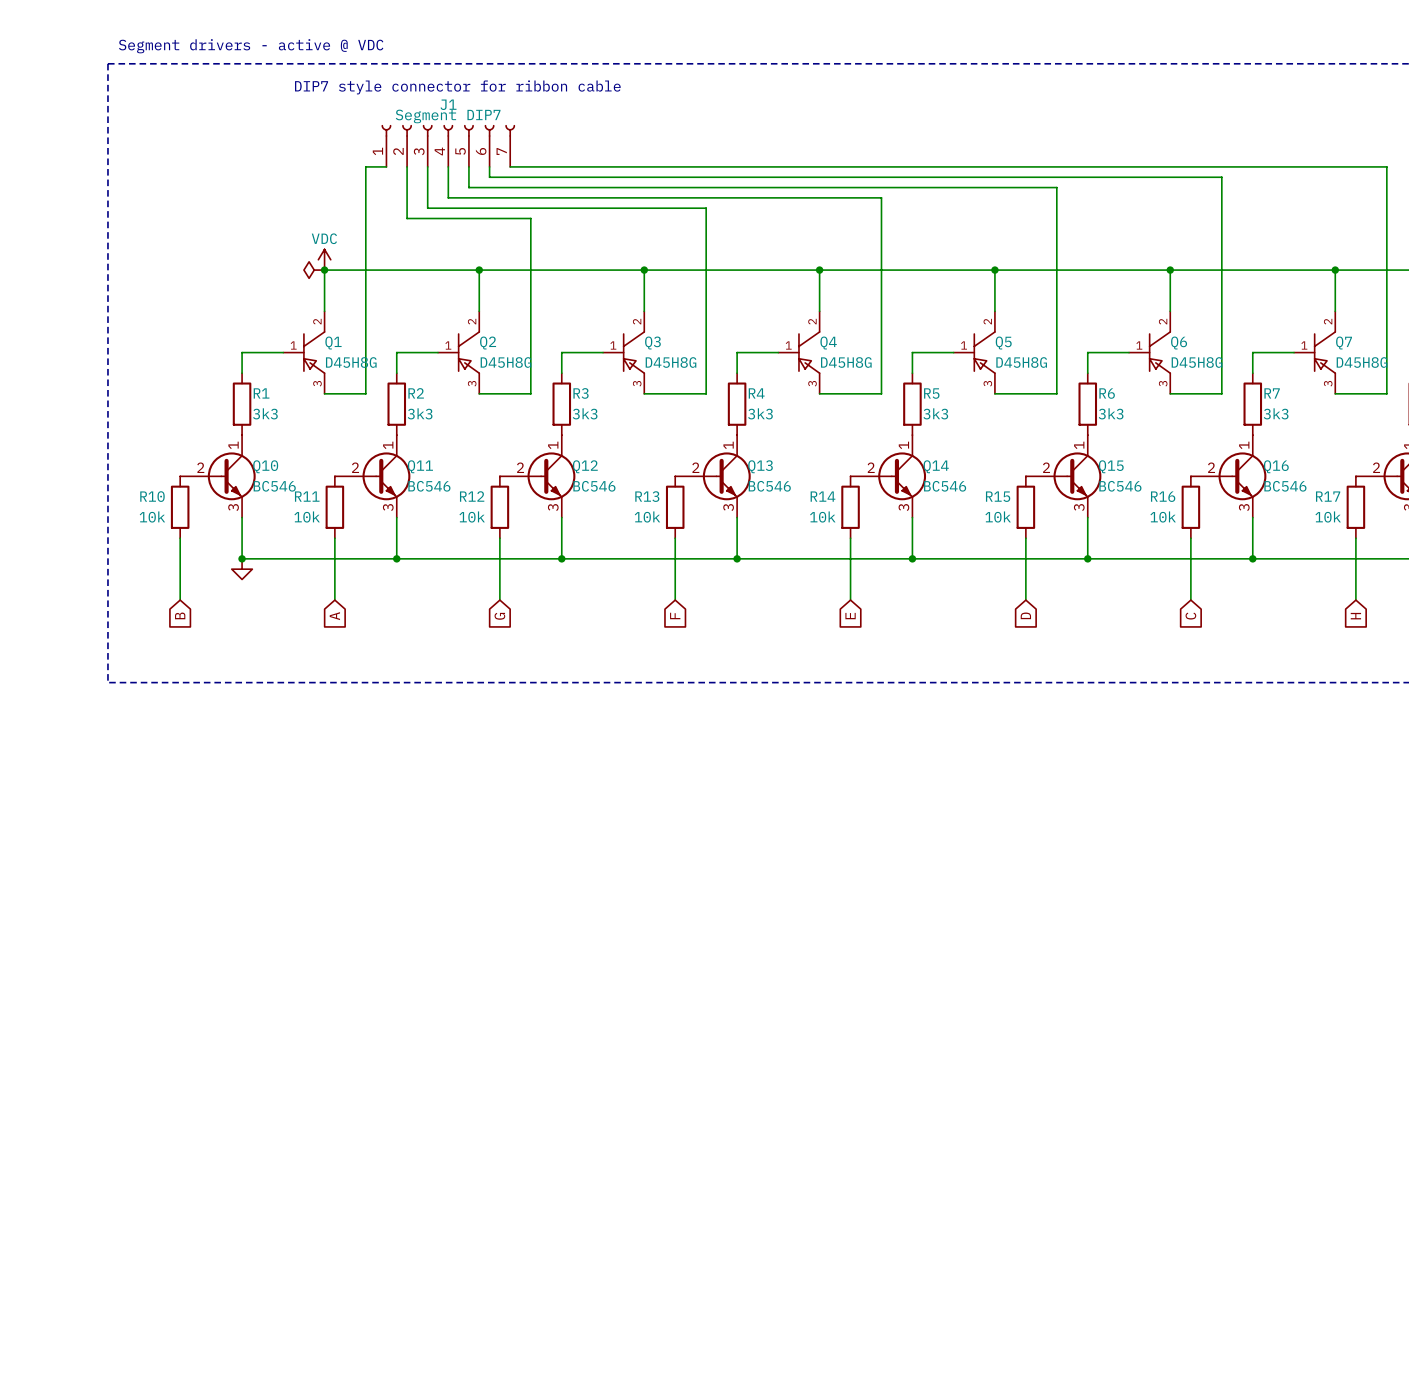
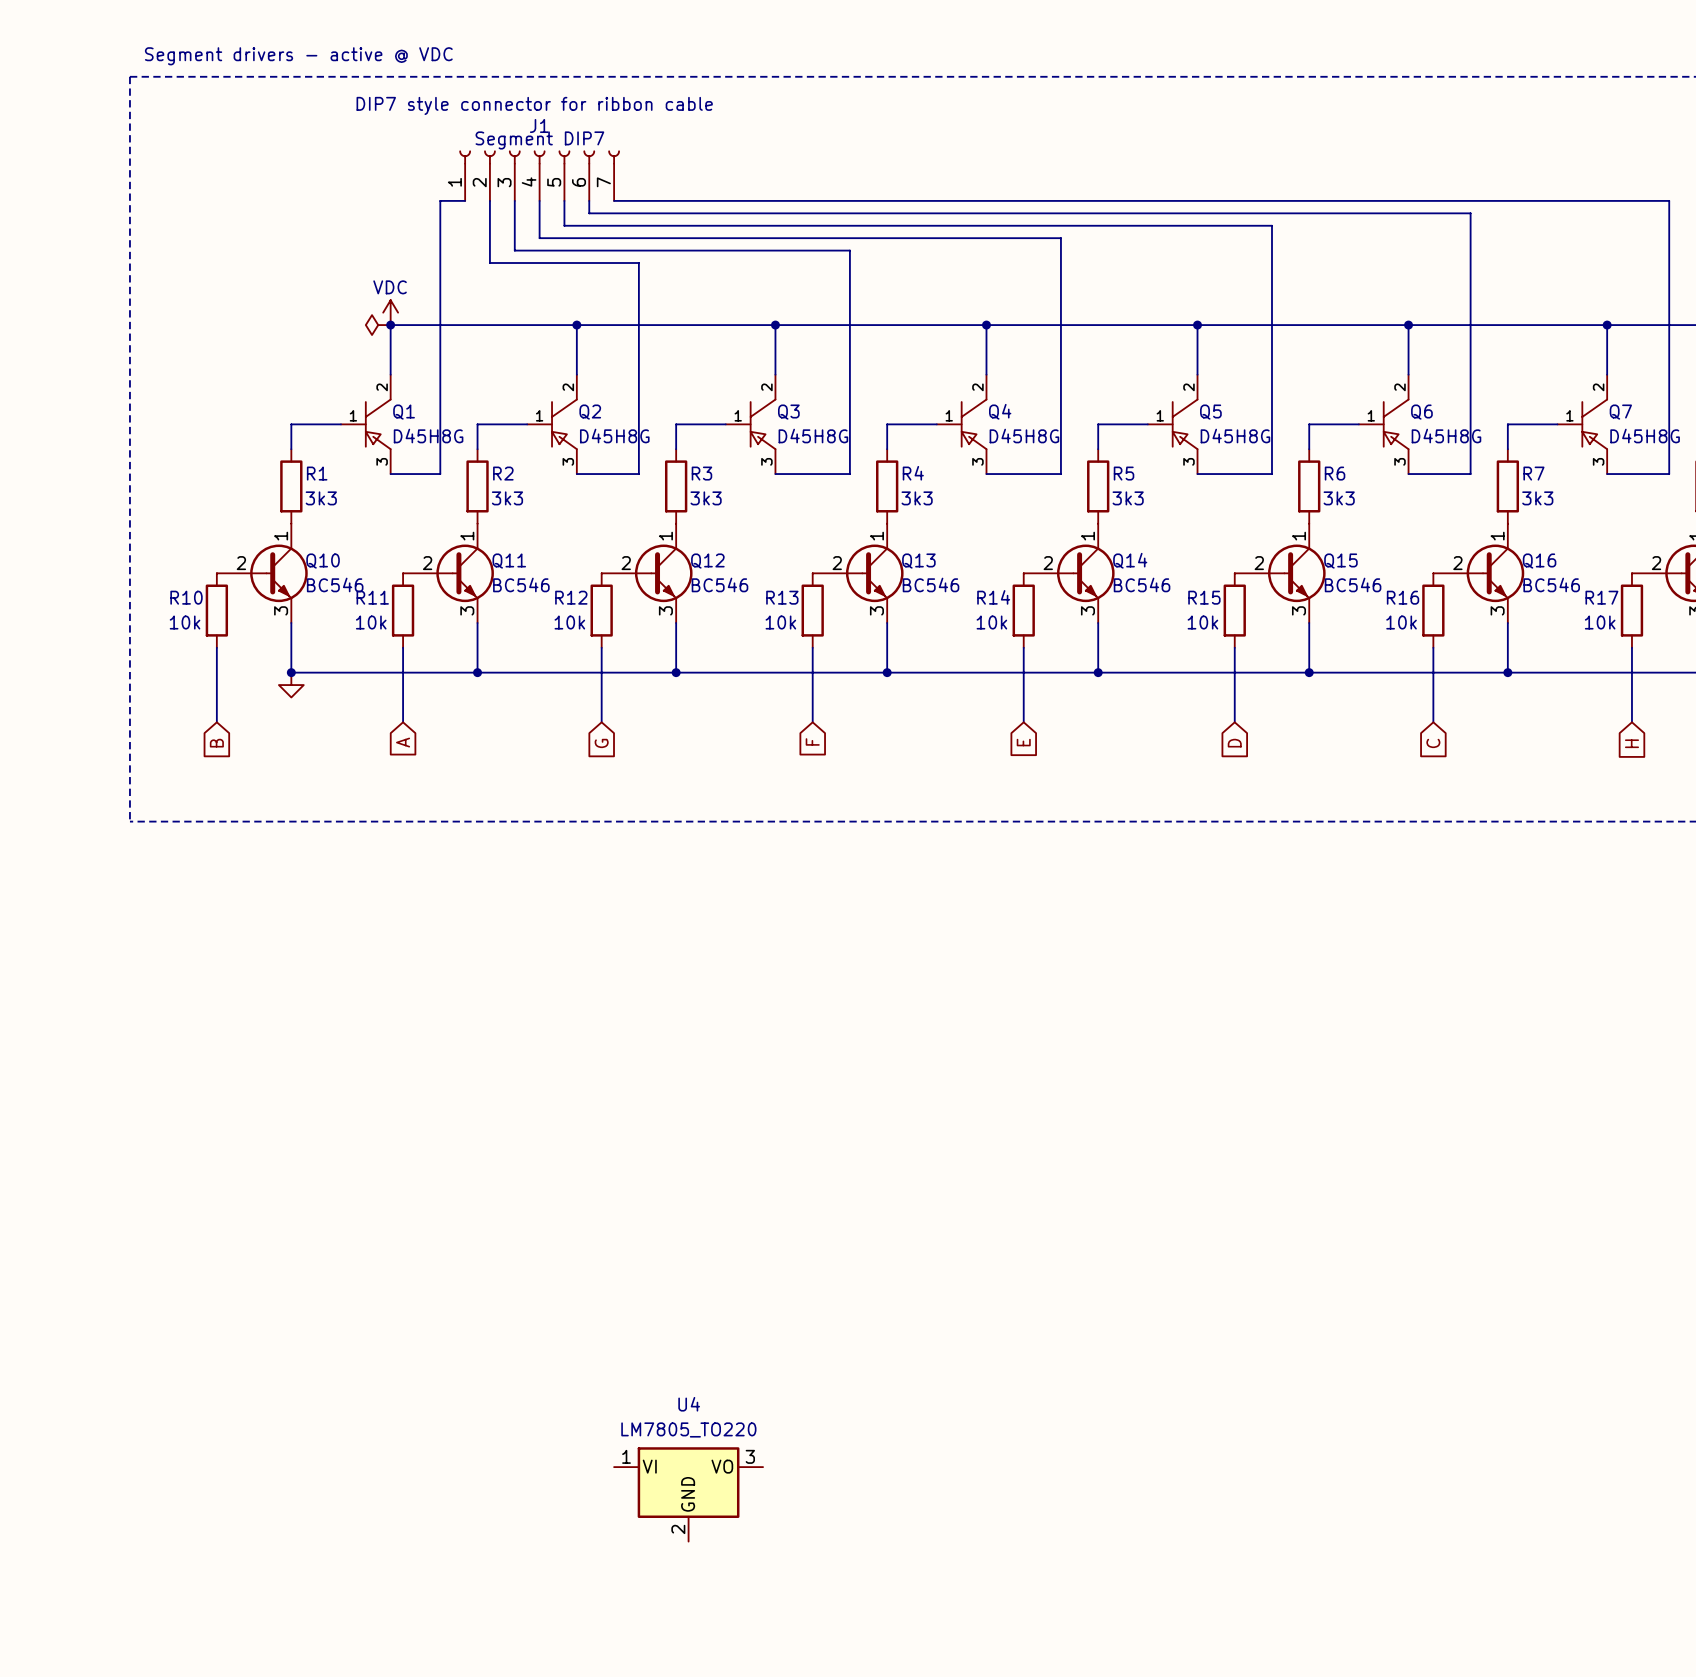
U4: none -> LM7805_TO220 (688, 1494)

